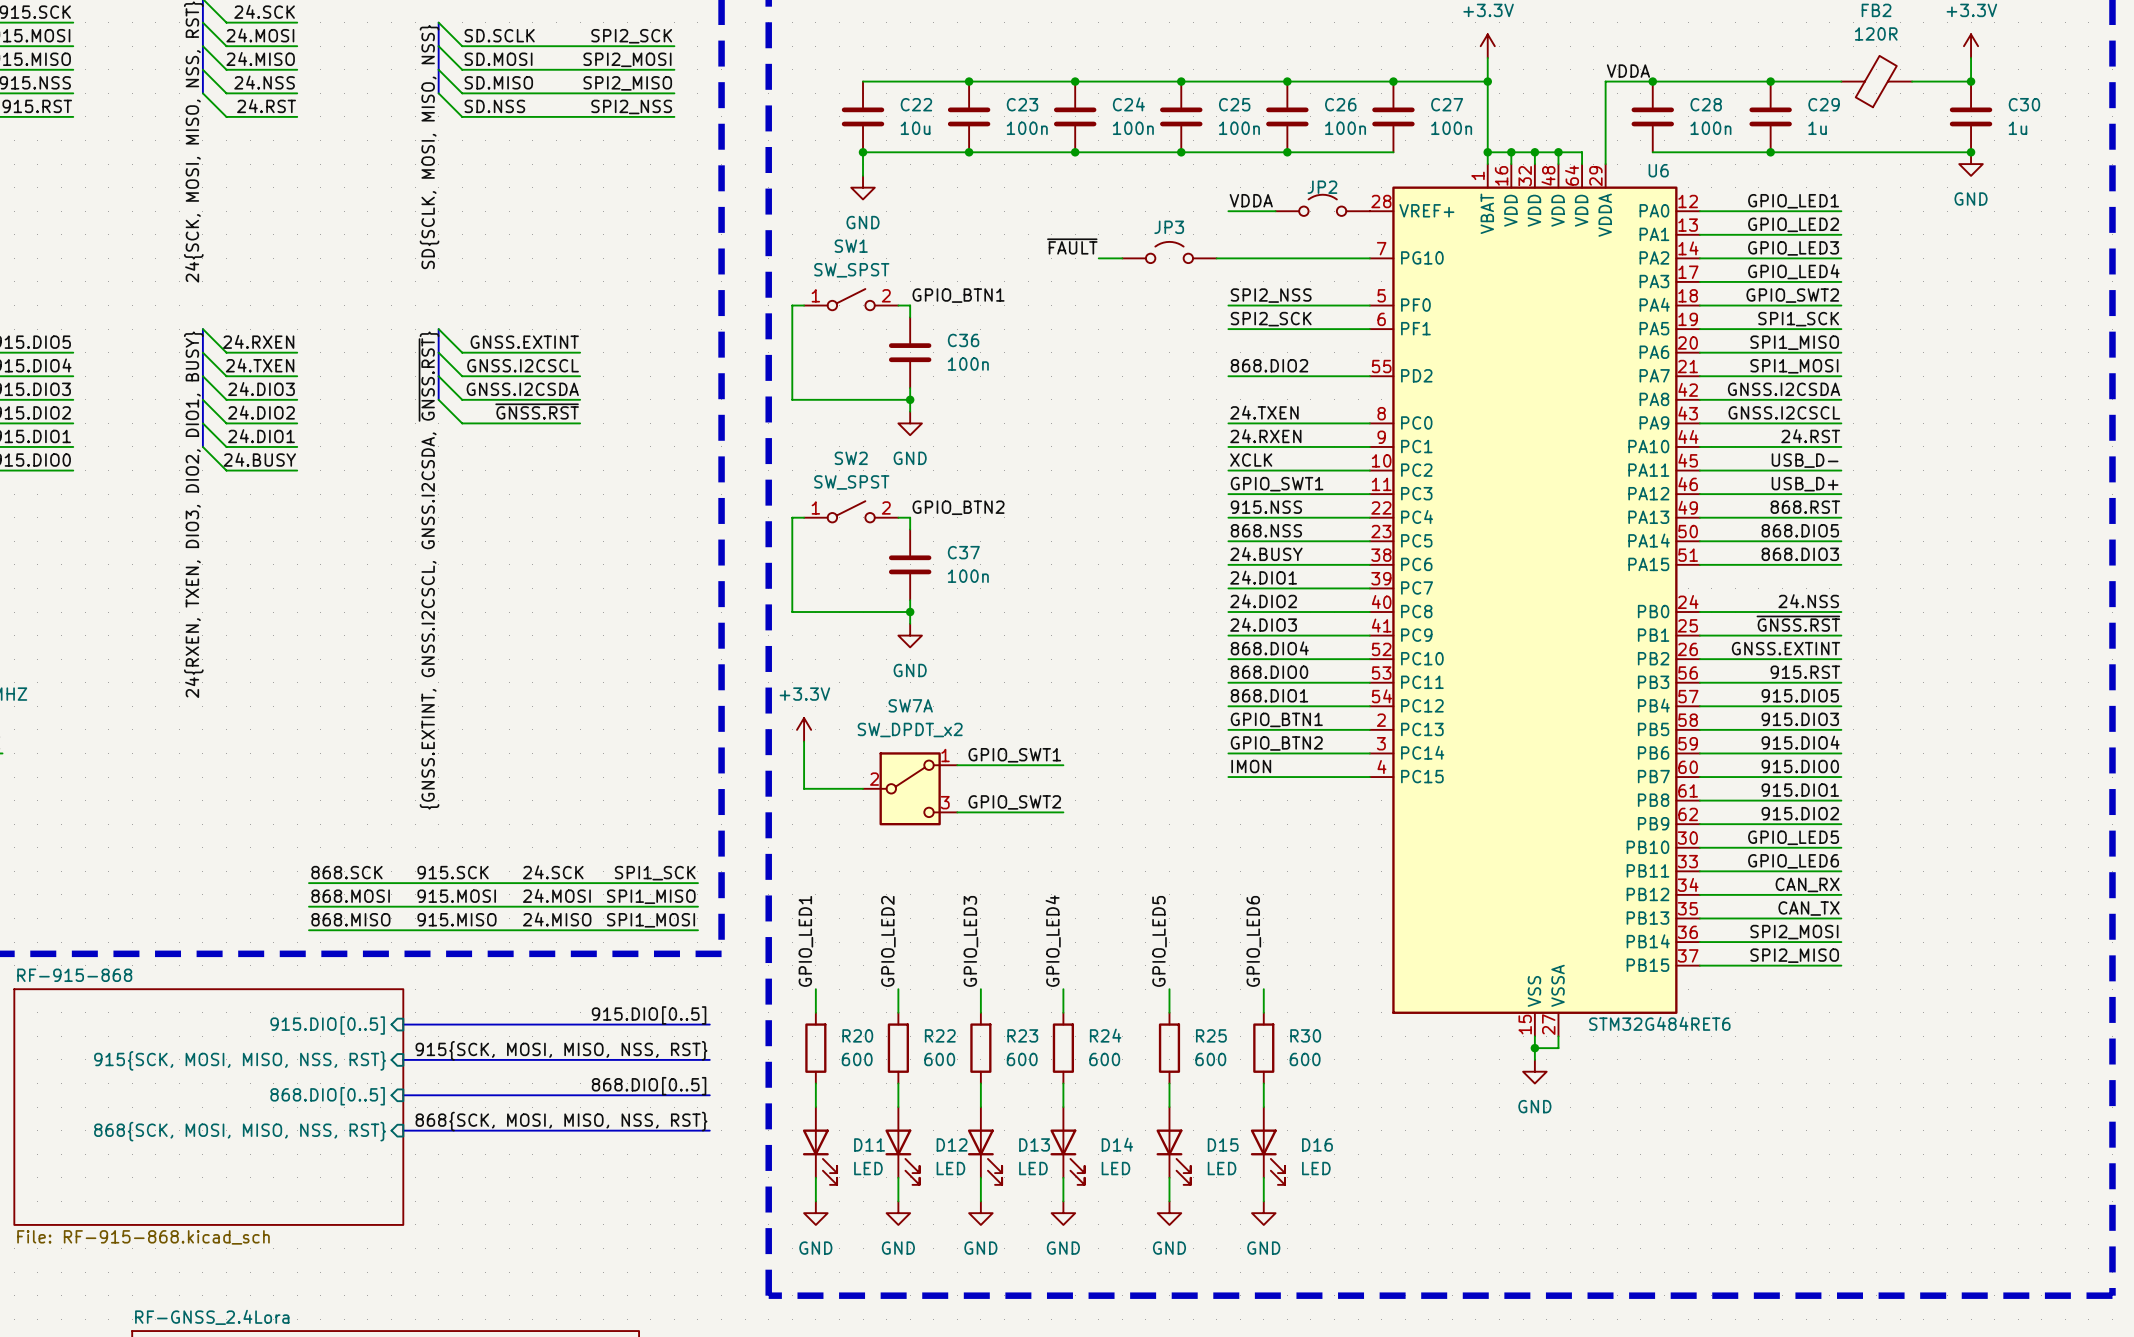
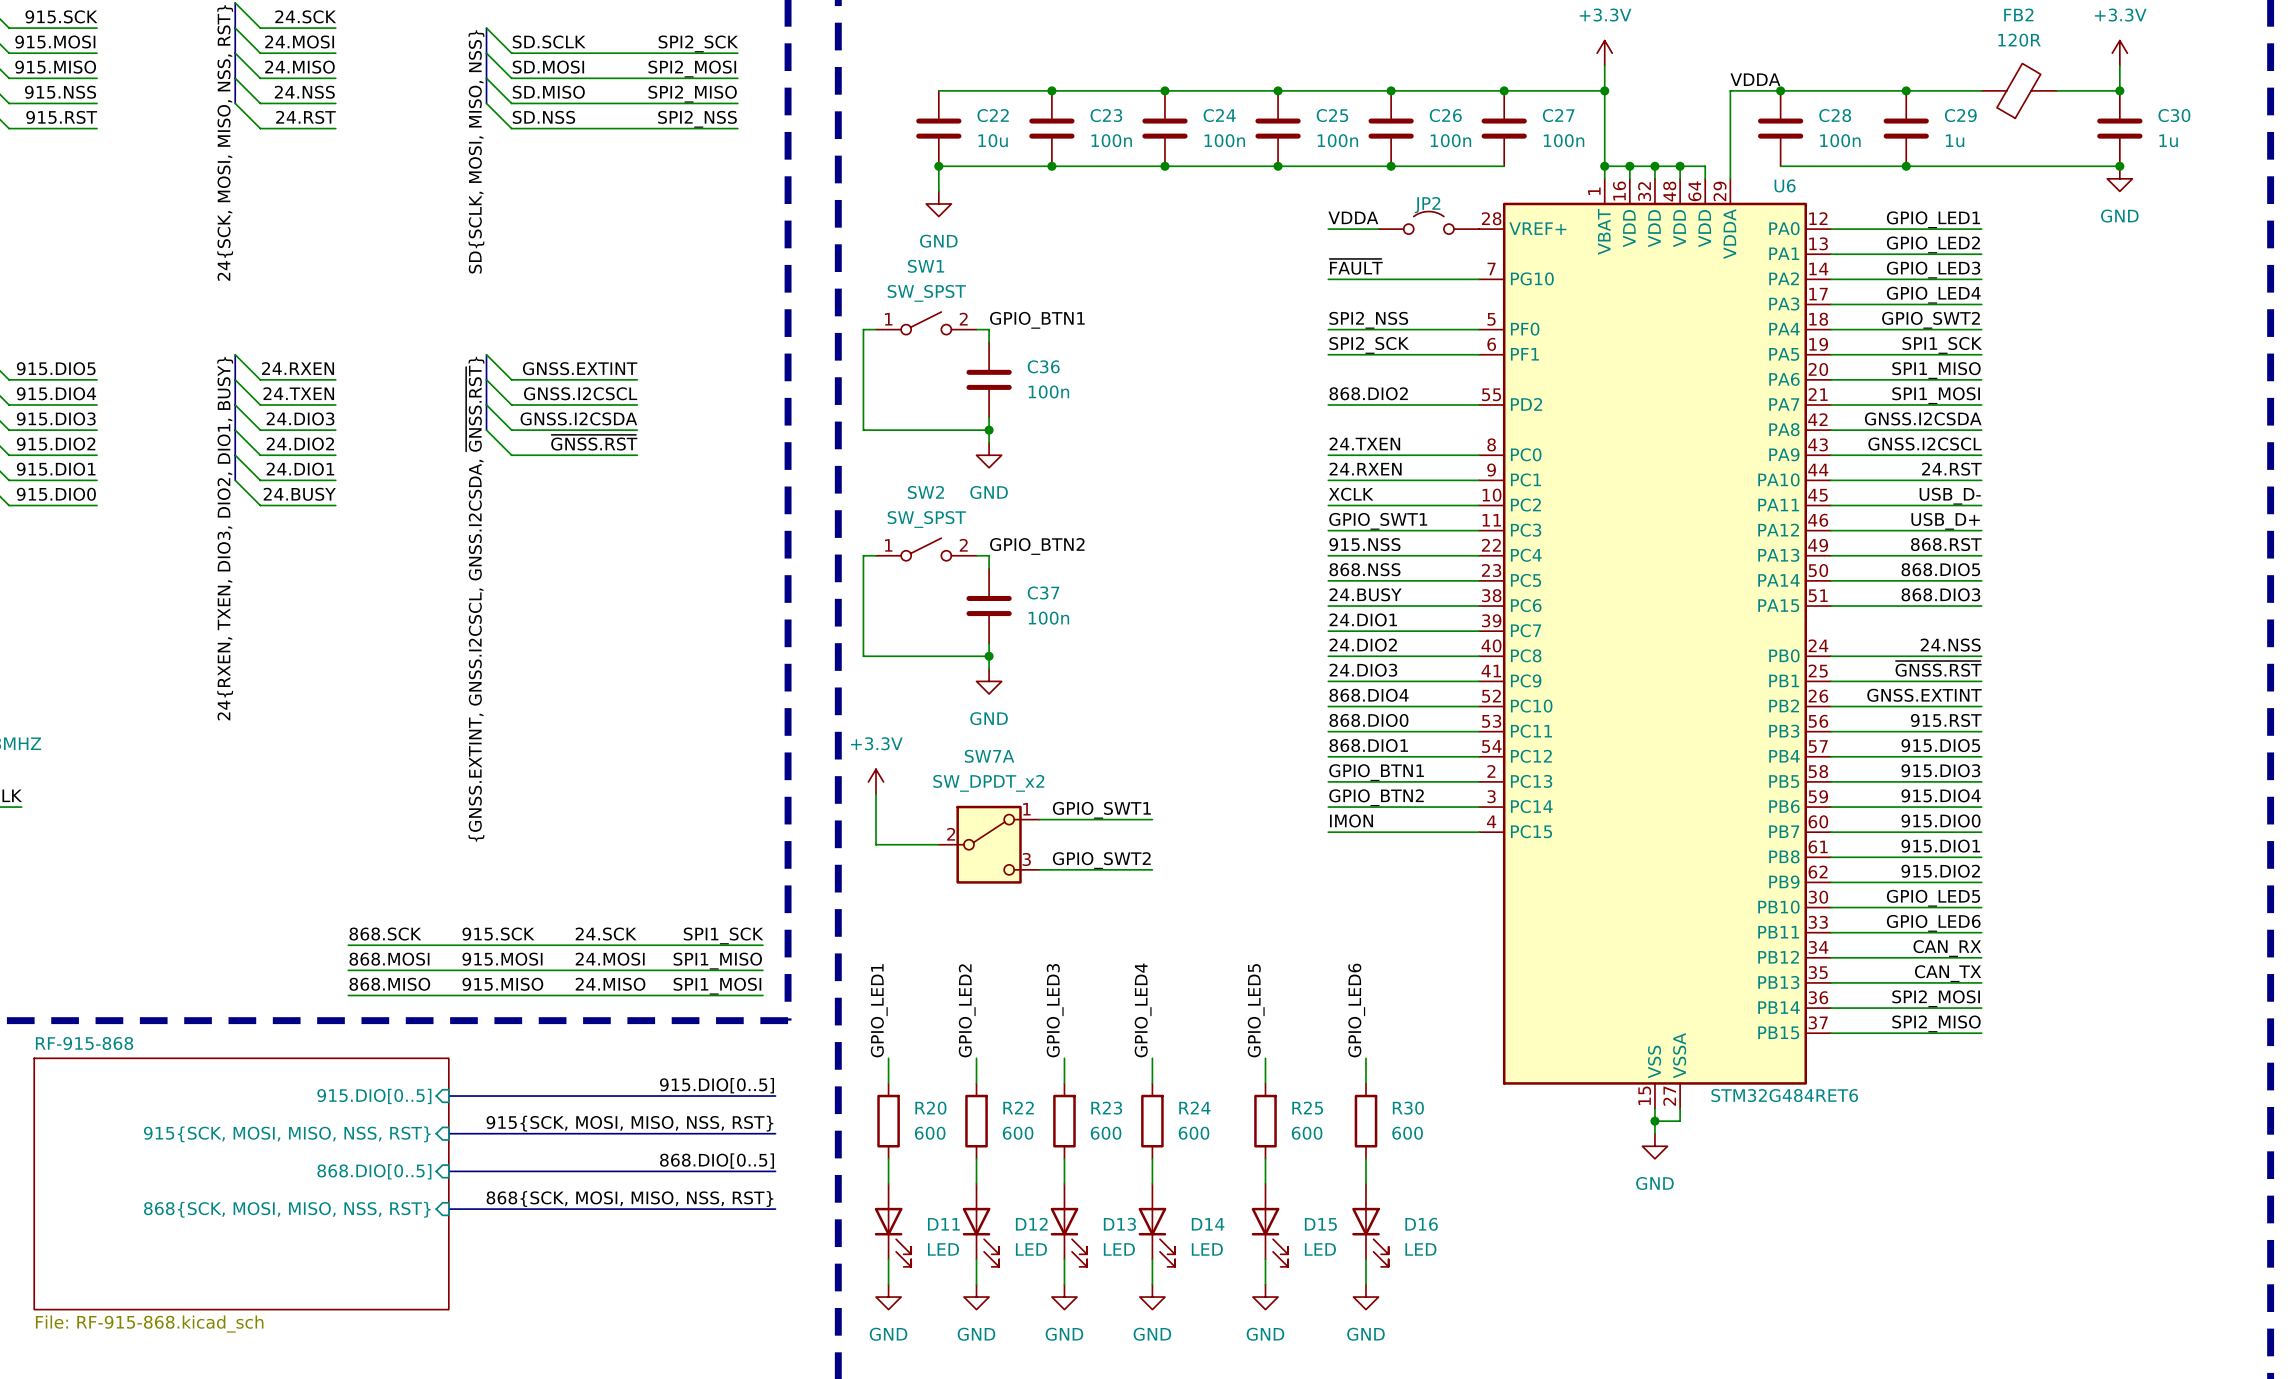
label position: ~{FAULT} (1072, 246) -> ~{FAULT} (1356, 266)
JP3: (1169, 252) -> none
wire: (1098, 258) (1122, 258) -> none
wire: (1216, 258) (1228, 258) -> none

